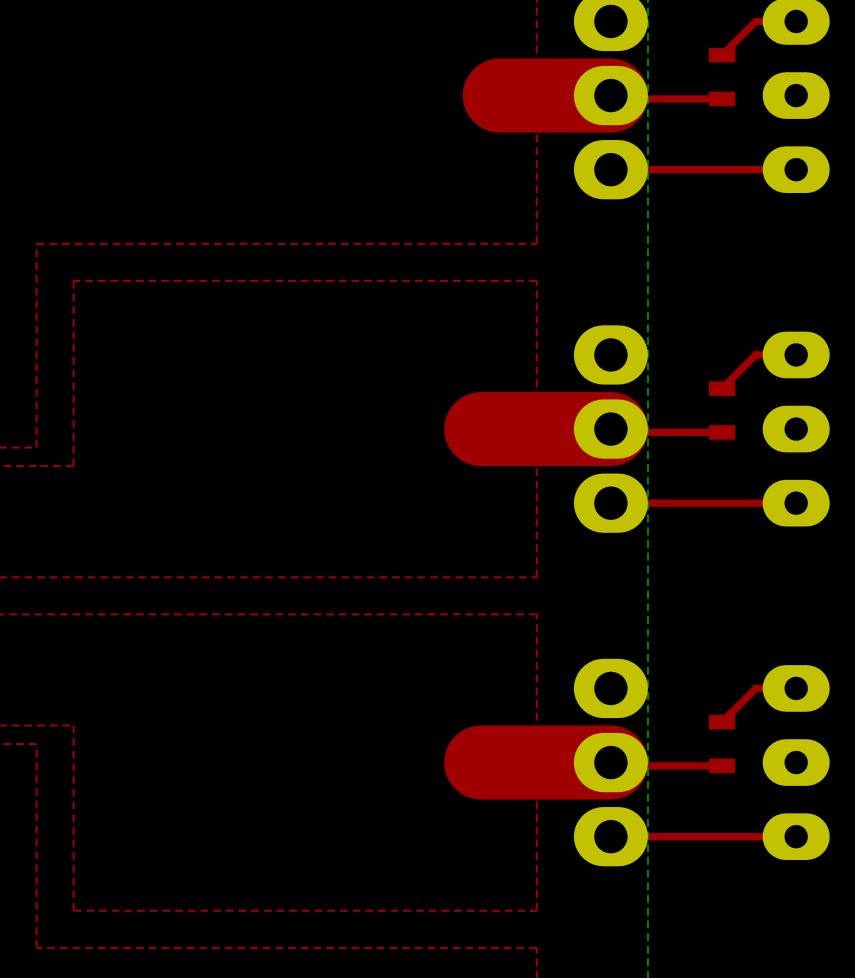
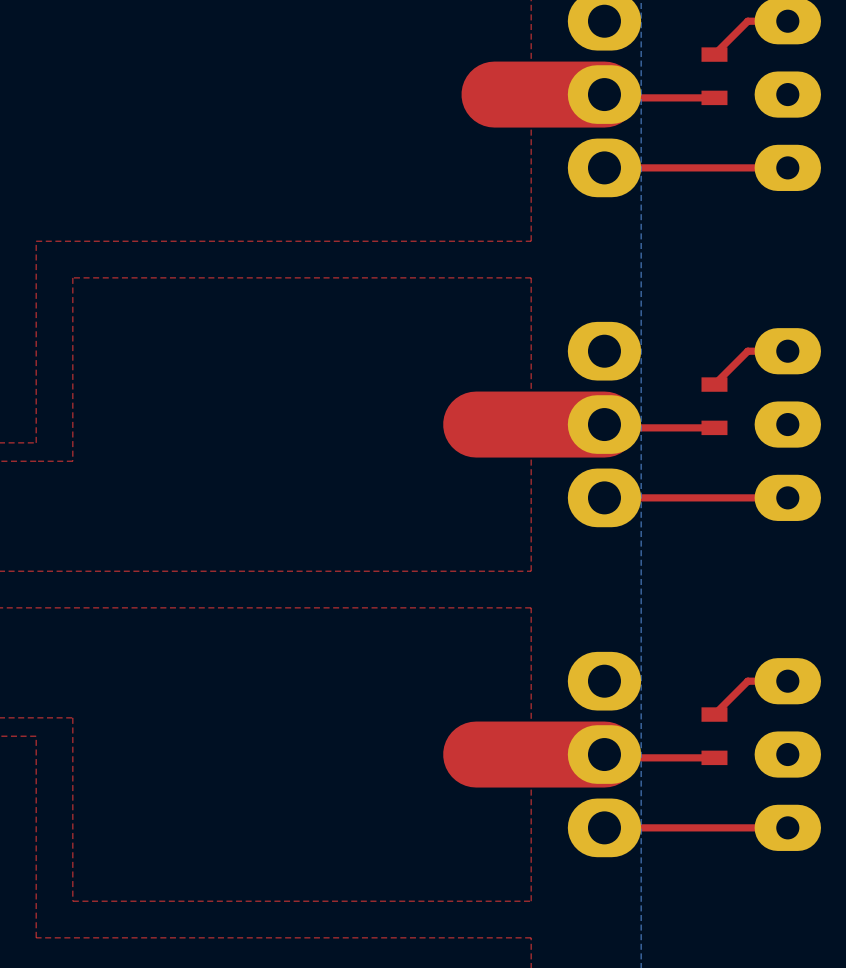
top track width: thick (610, 95) (499, 95) -> thin (604, 94) (494, 94)
top track width: thick (610, 429) (481, 429) -> thin (604, 424) (476, 424)
top track width: thick (610, 762) (481, 762) -> thin (604, 754) (476, 754)

